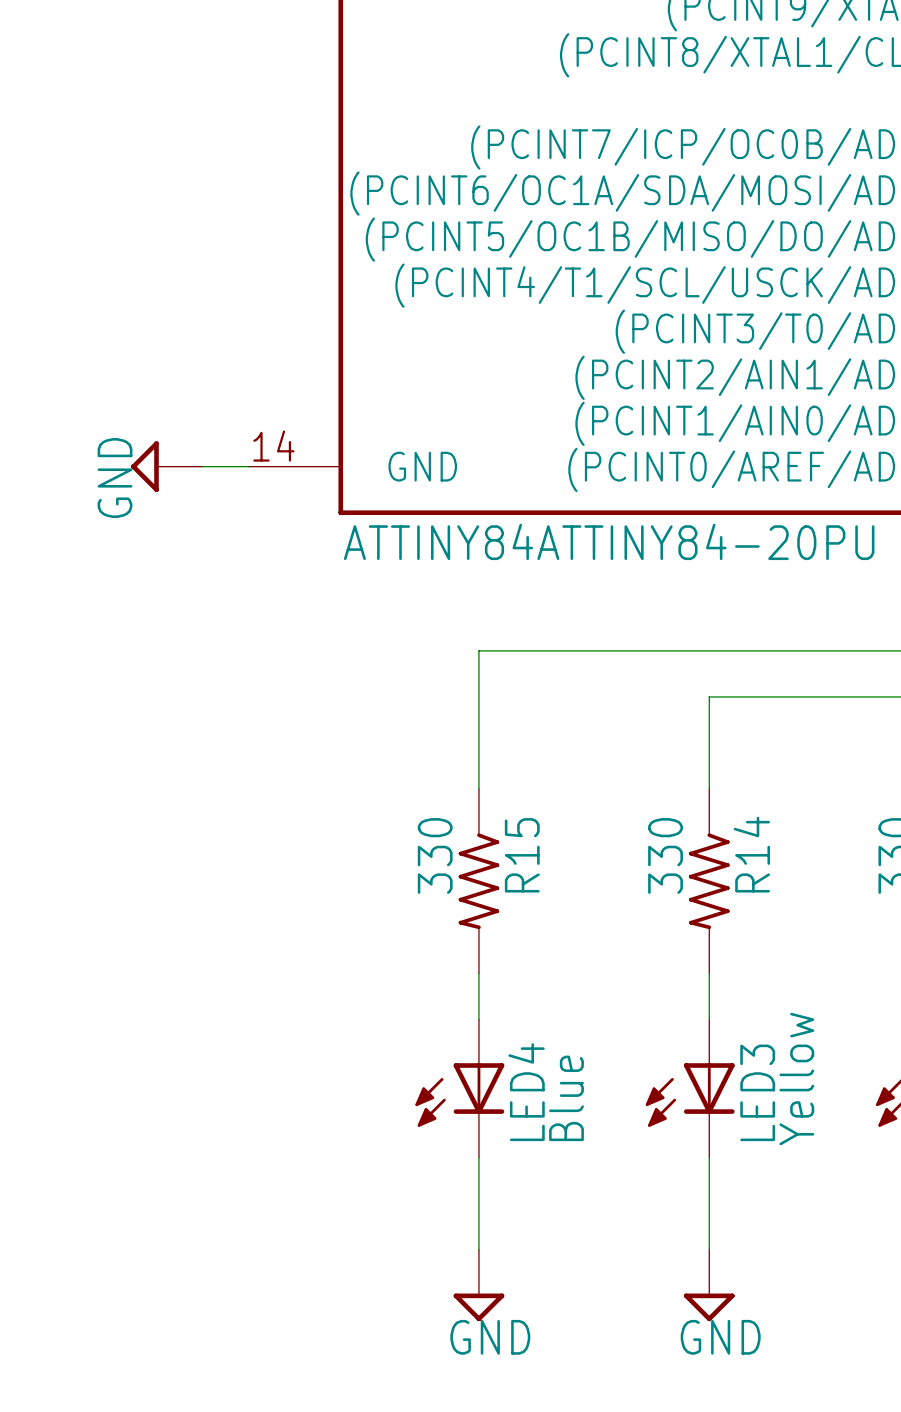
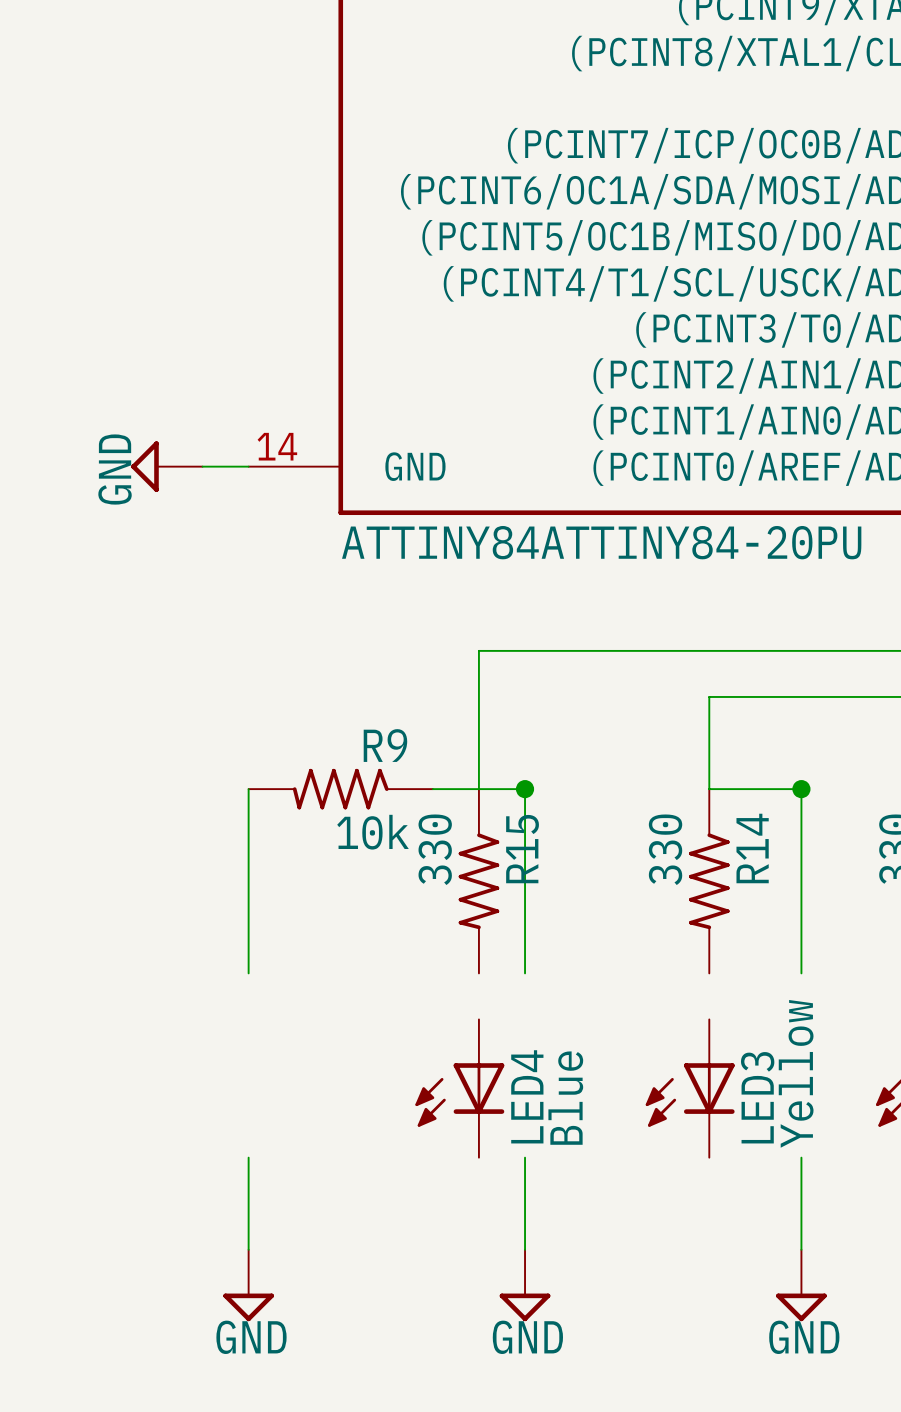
wire: none -> (248, 789) (248, 973)
R9: none -> 10k (340, 789)
wire: none -> (432, 789) (525, 789) (525, 973)
junction: none -> (525, 789)
wire: none -> (709, 789) (801, 789) (801, 973)
junction: none -> (801, 789)
wire: (478, 973) (478, 1019) -> none
wire: (709, 973) (709, 1019) -> none
wire: none -> (248, 1157) (248, 1249)
wire: (478, 1157) (478, 1249) -> (525, 1157) (525, 1249)
wire: (709, 1157) (709, 1249) -> (801, 1157) (801, 1249)
power symbol: none -> GND (248, 1285)
power symbol position: GND (478, 1285) -> GND (525, 1285)
power symbol: GND (709, 1285) -> none
power symbol: none -> GND (801, 1285)

